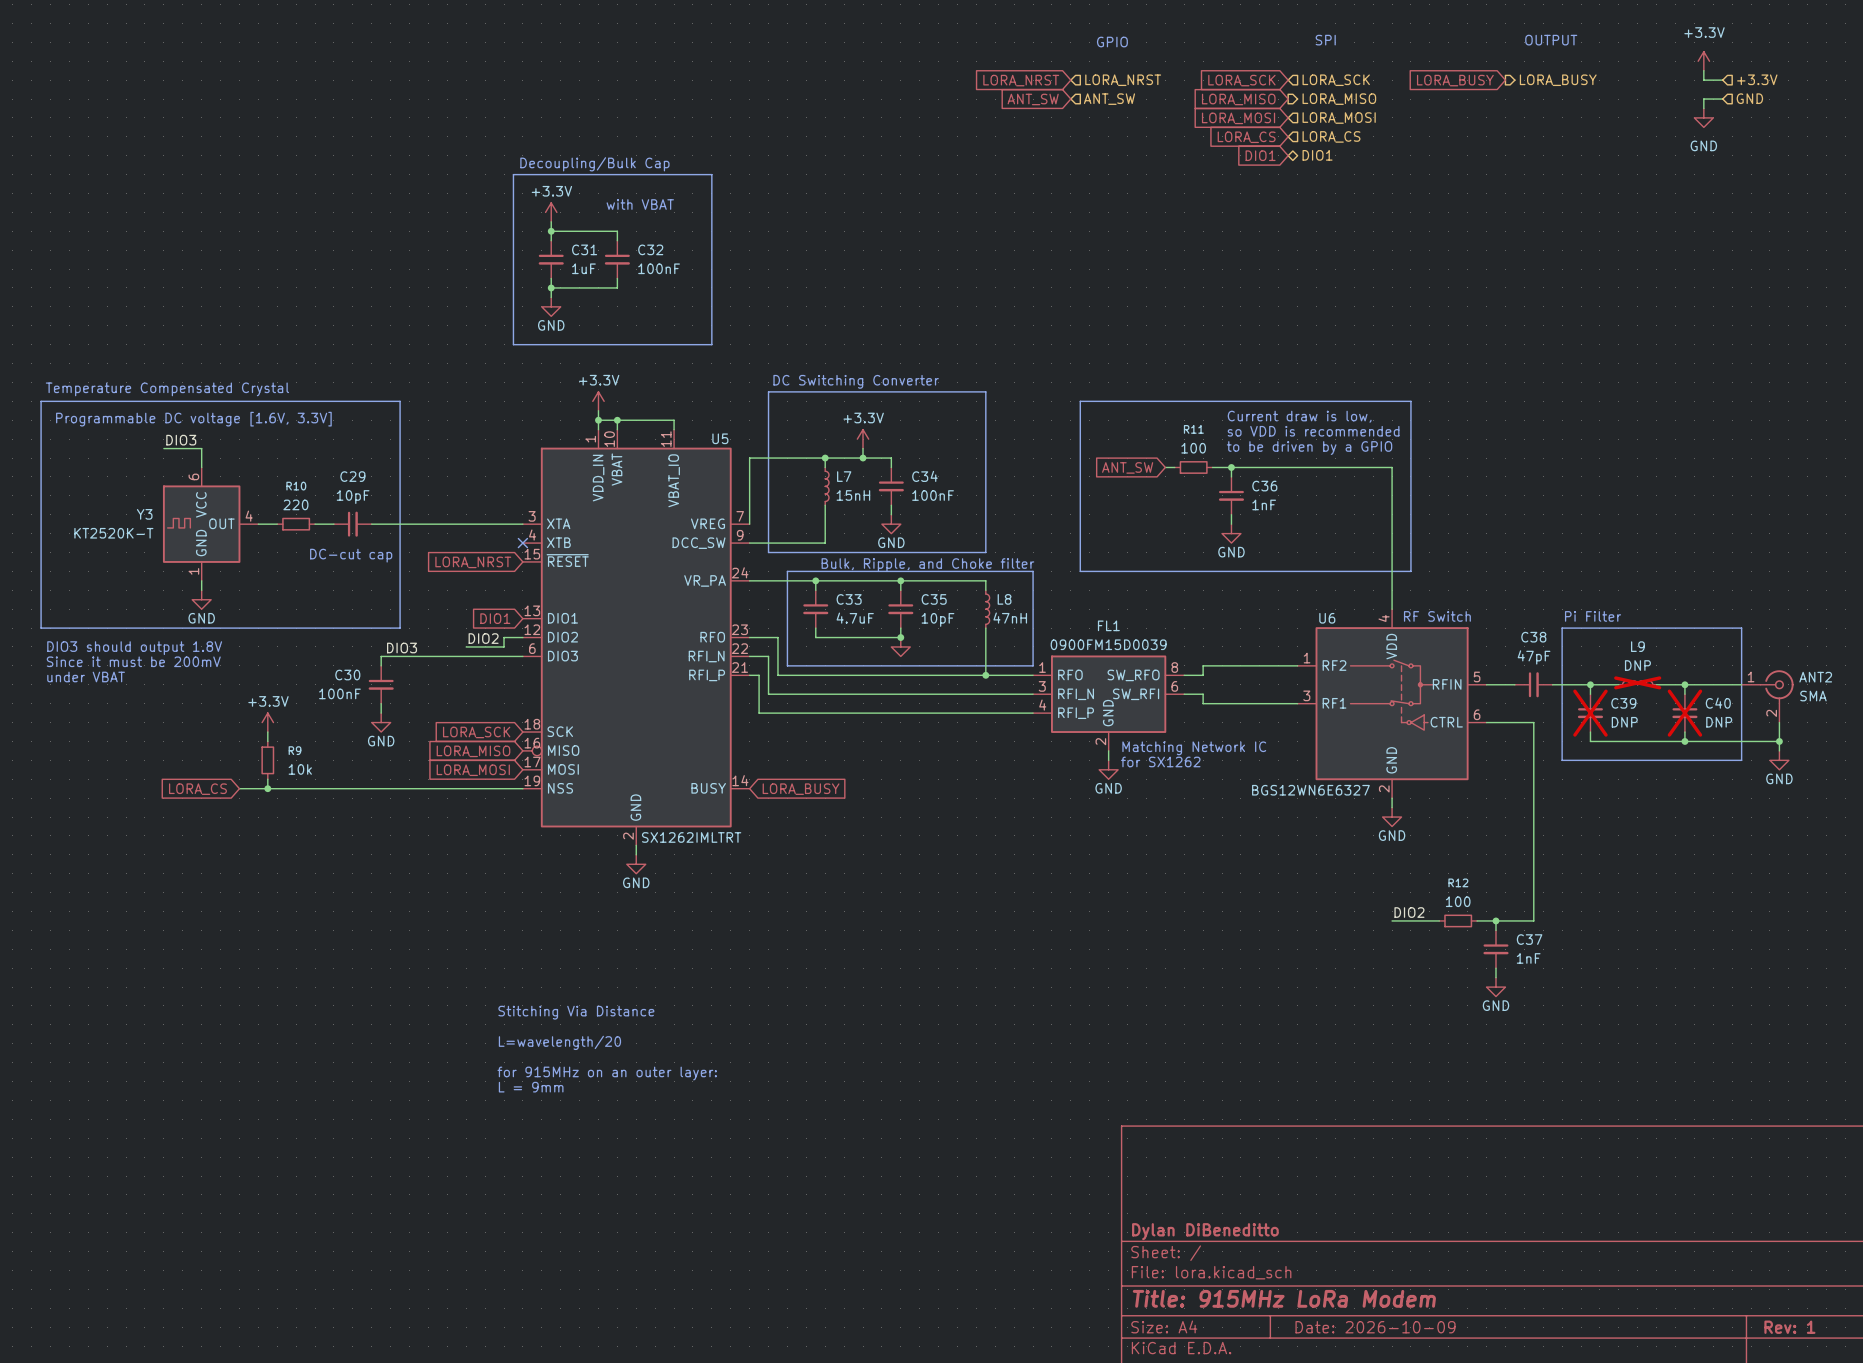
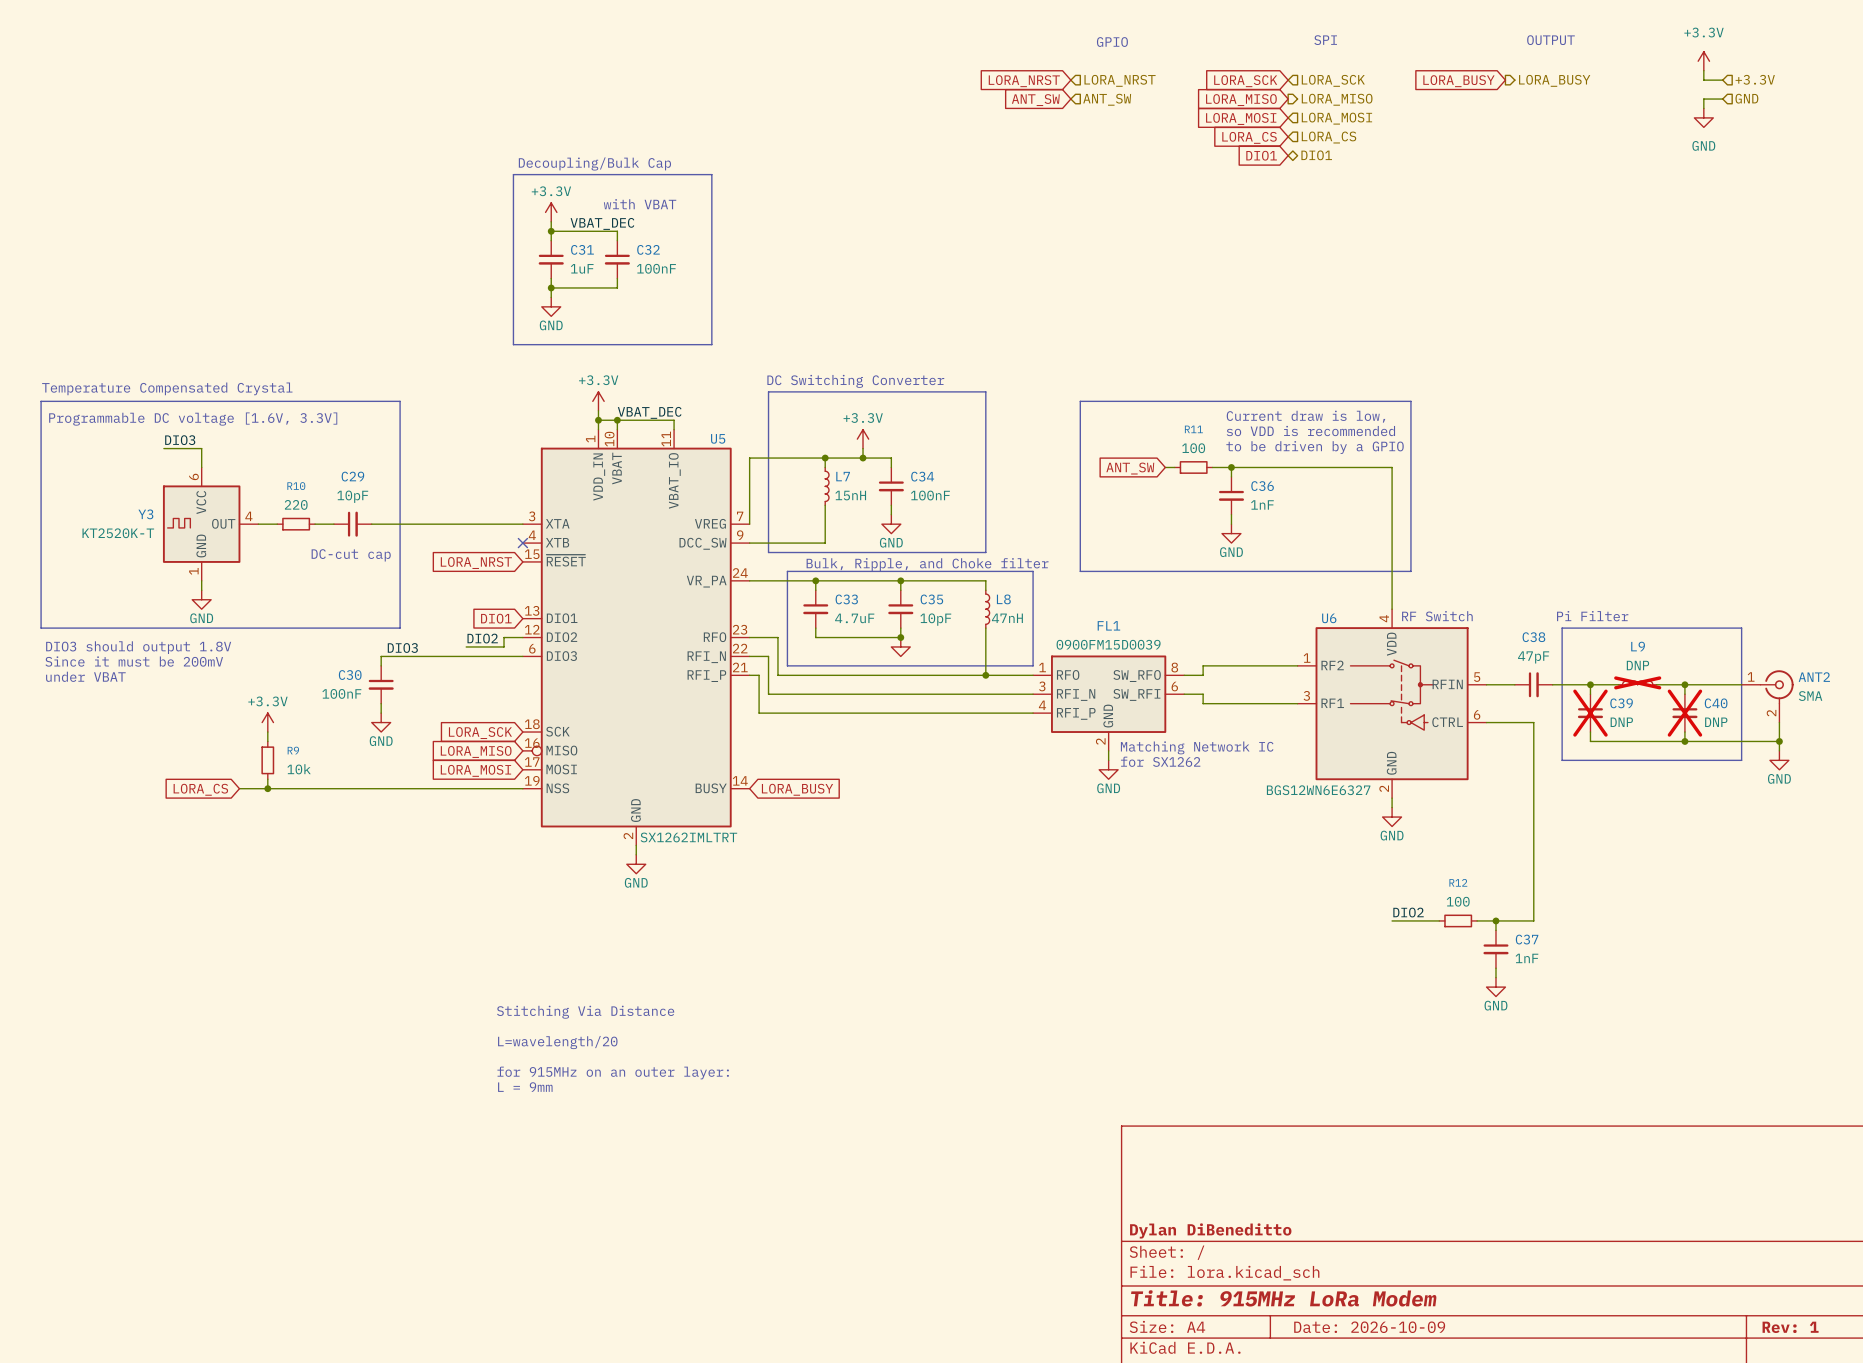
label: none -> VBAT_DEC (602, 223)
label: none -> VBAT_DEC (649, 412)

